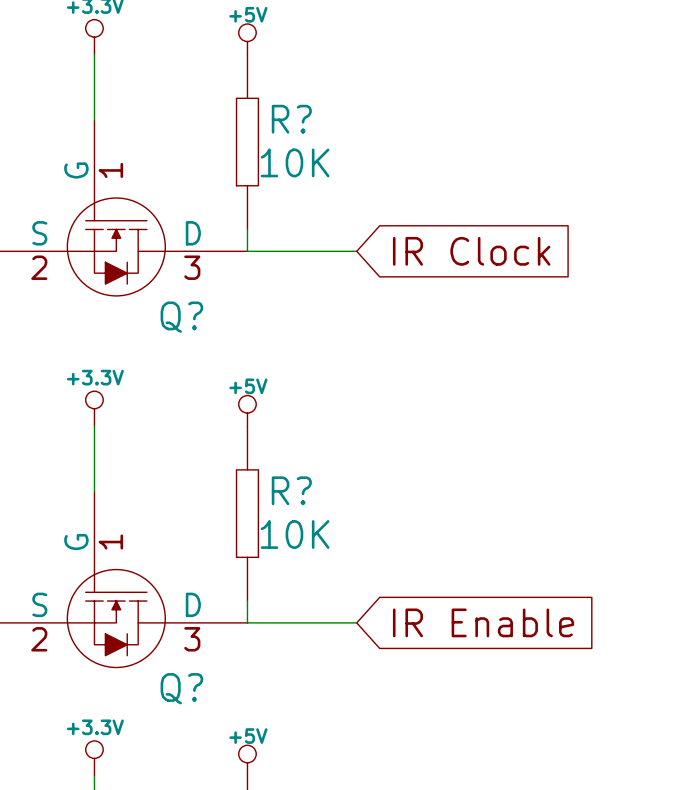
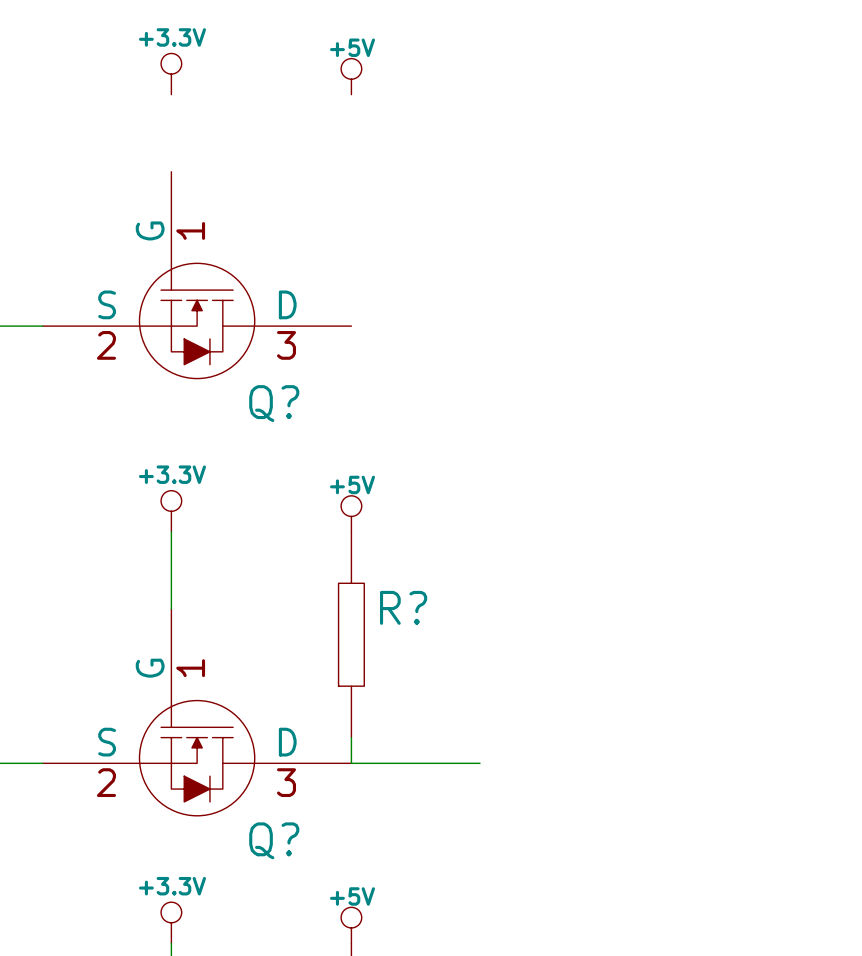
wire: (94, 54) (94, 120) -> none
R?: (247, 142) -> none
wire: (247, 229) (247, 251) (356, 251) -> none
global label: IR Clock (471, 251) -> none
R? text: 10K (295, 534) -> none
global label: IR Enable (483, 622) -> none

